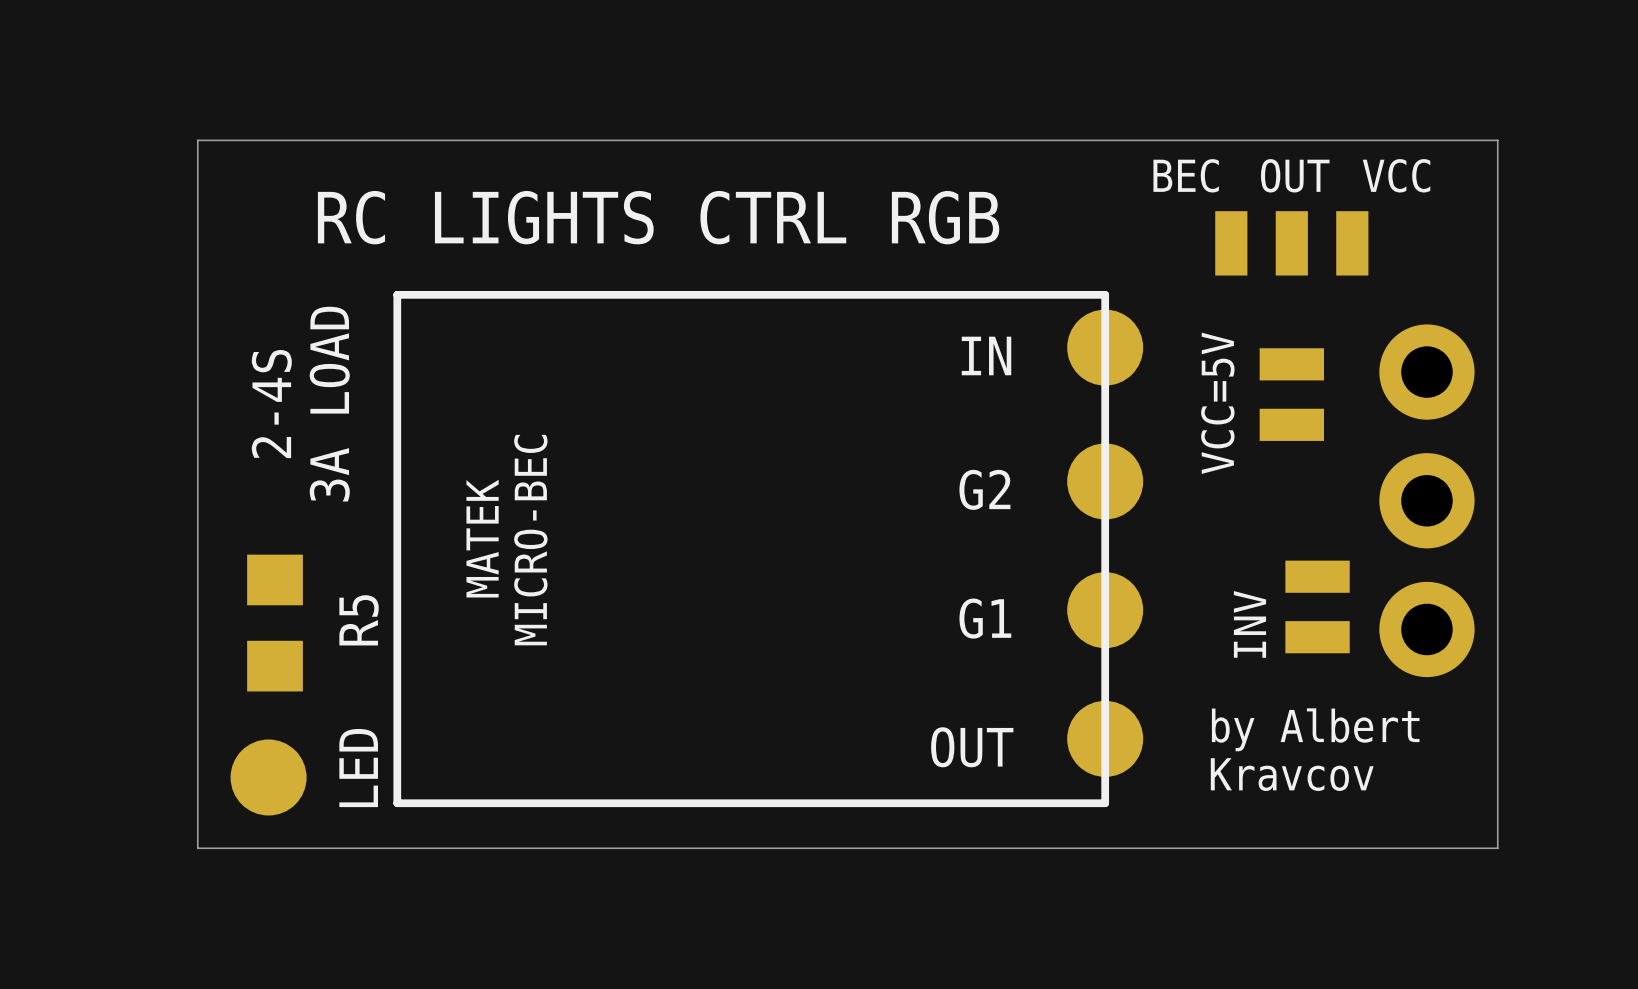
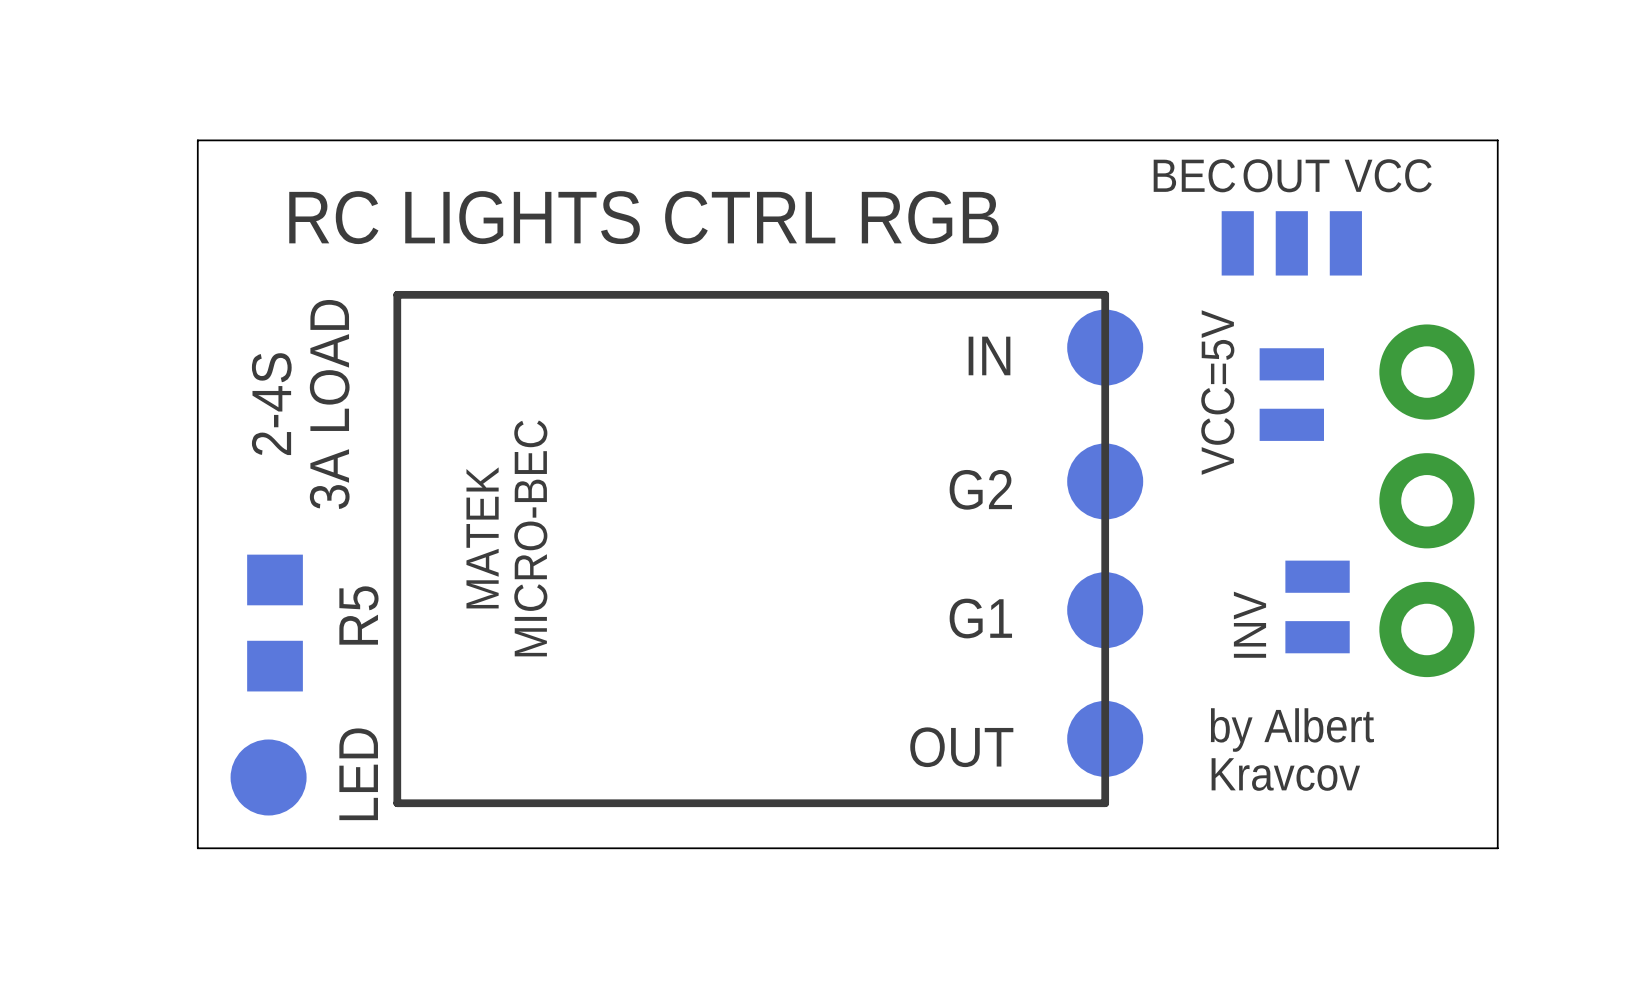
part footprint: [1215, 211, 1369, 276] -> [1221, 211, 1362, 276]

